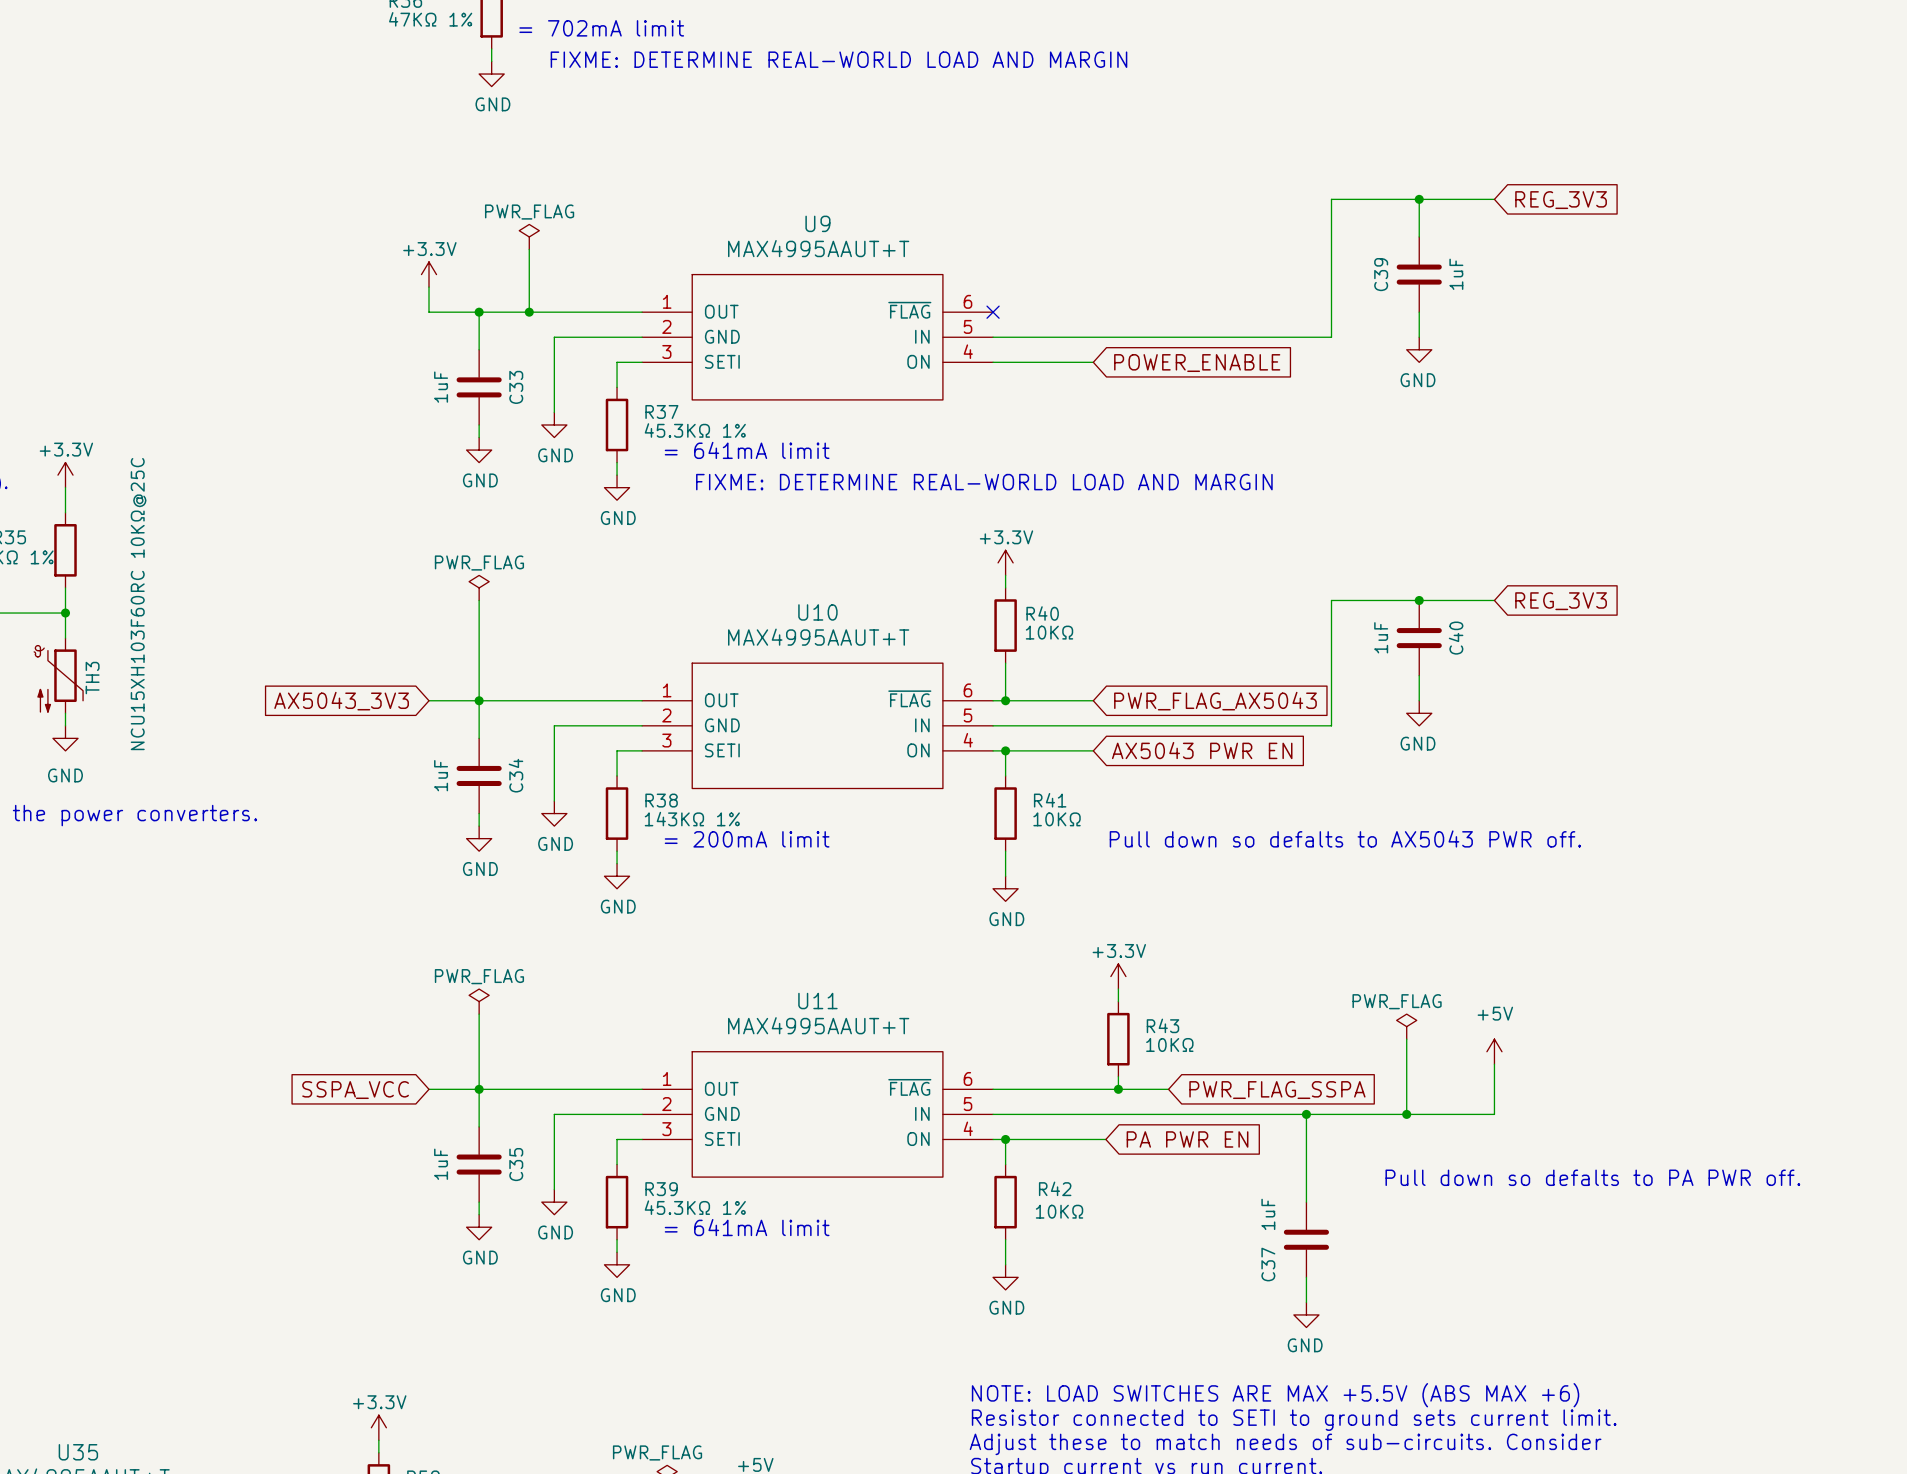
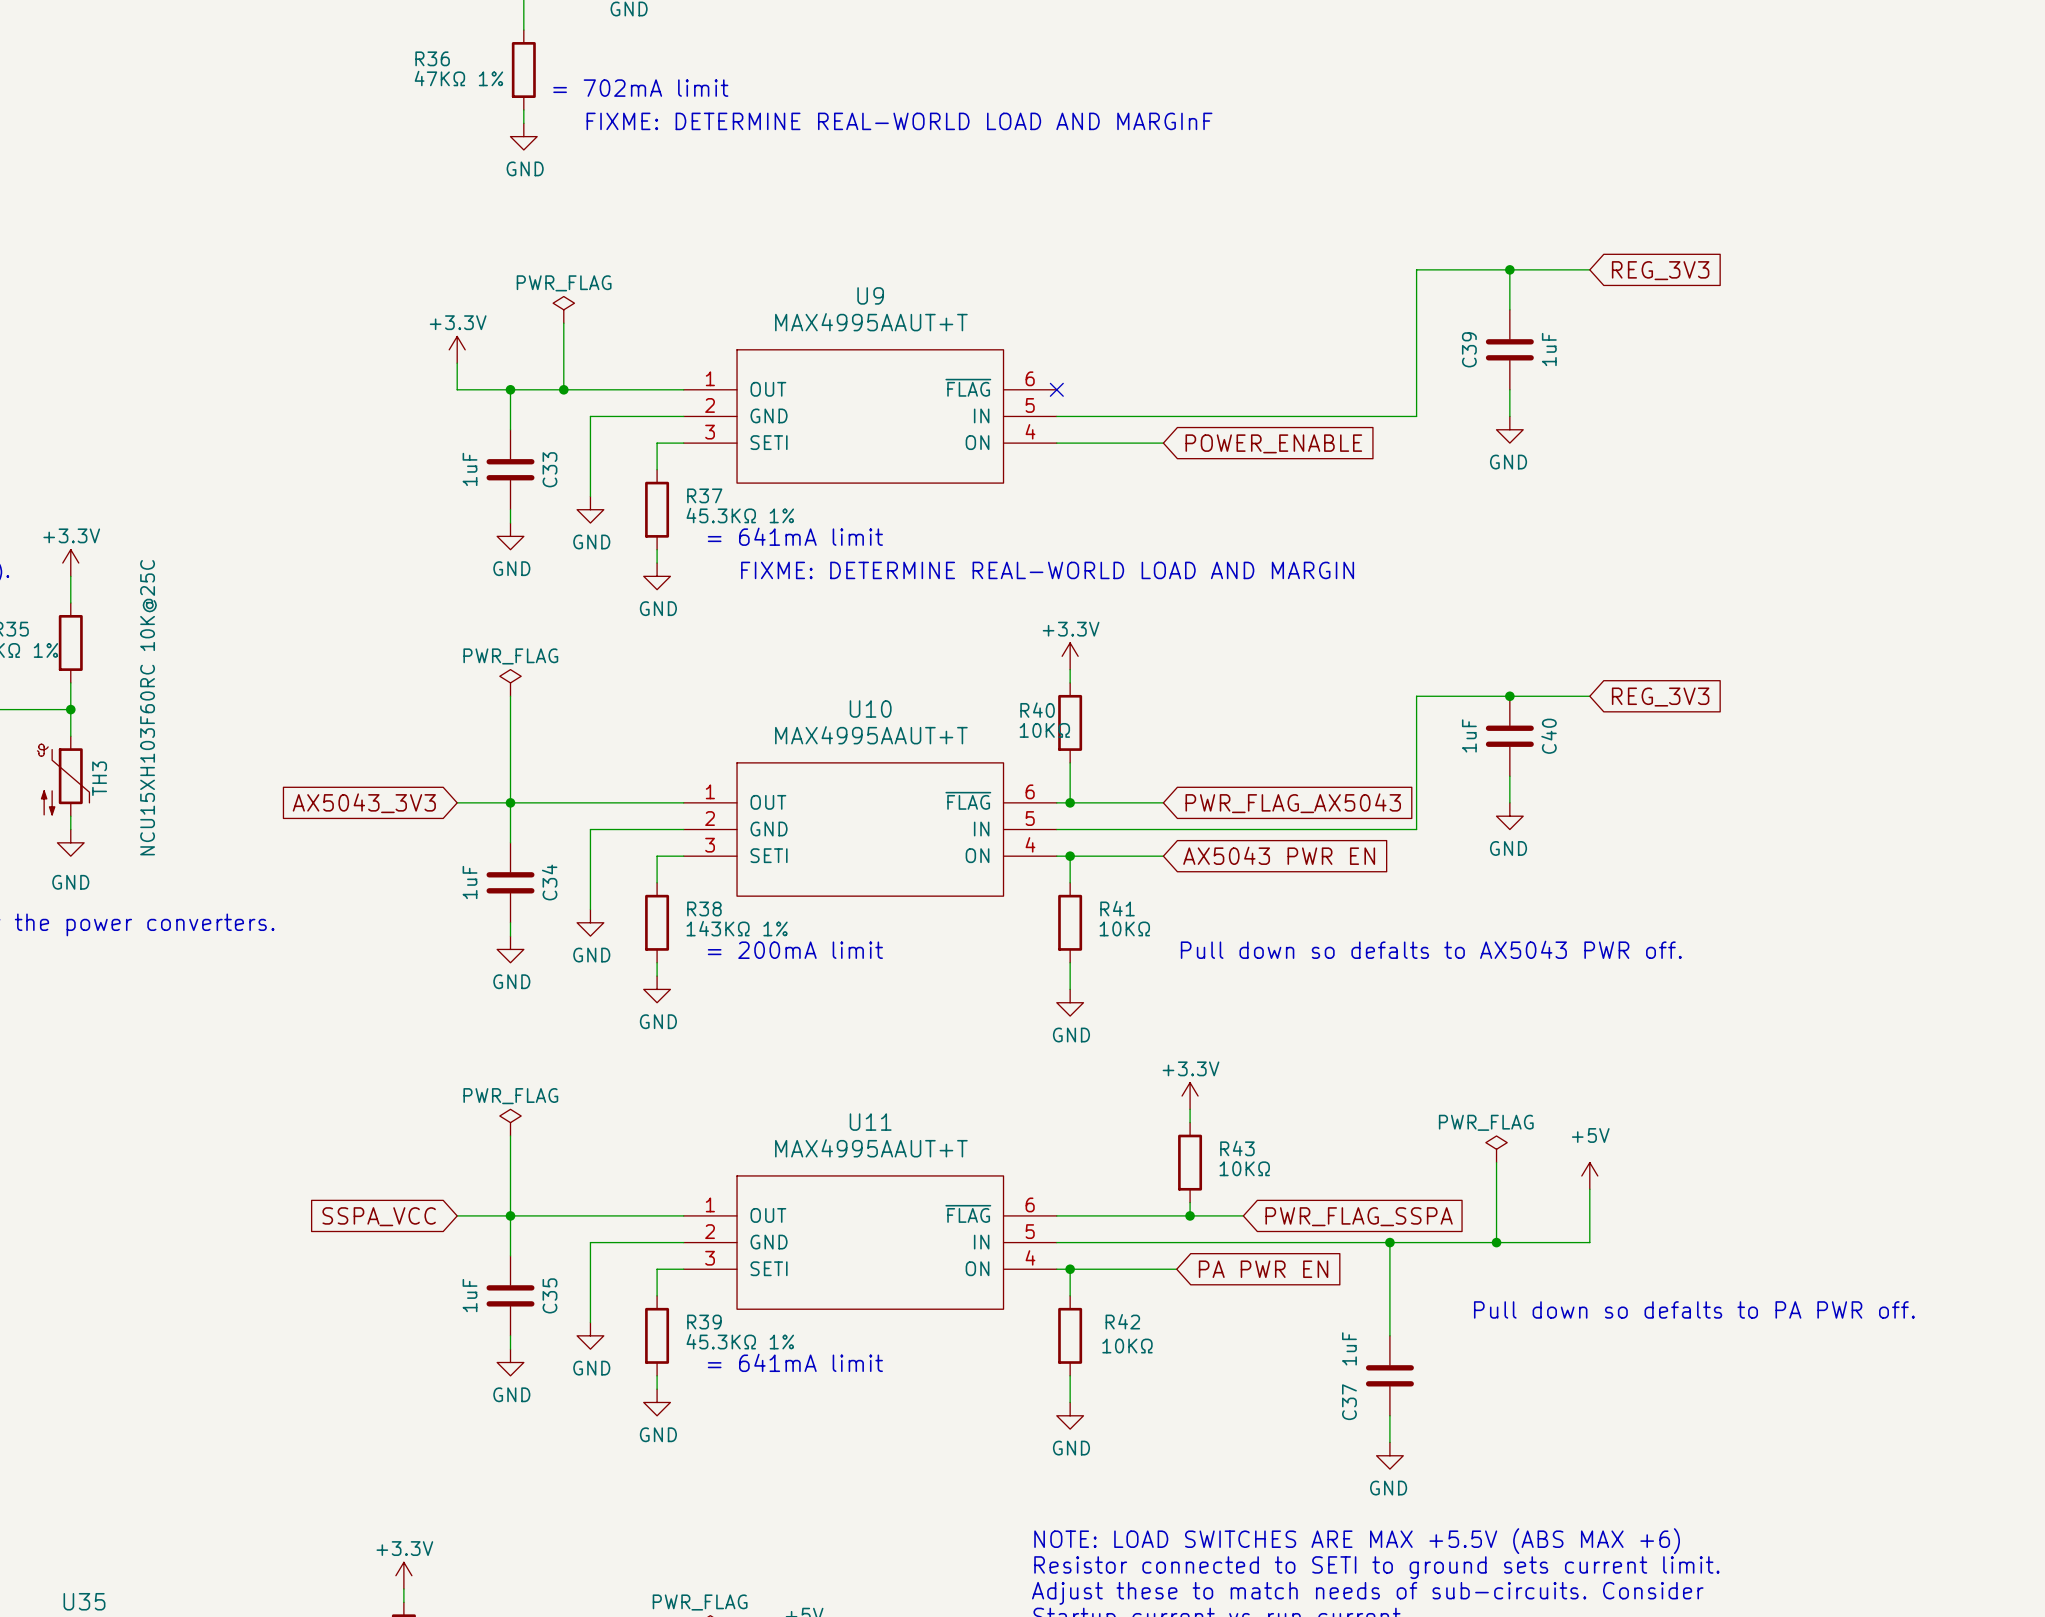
text: FIXME: DETERMINE REAL-WORLD LOAD AND MARGIN (838, 59) -> FIXME: DETERMINE REAL-WORLD LOAD AND MARGInF (899, 121)
TH3 value: NCU15XH103F60RC 10KΩ@25C (138, 604) -> NCU15XH103F60RC 10K@25C (148, 707)
R40 name position: R40 (1042, 613) -> R40 (1037, 710)
R40 value position: 10KΩ (1049, 632) -> 10KΩ (1044, 730)

